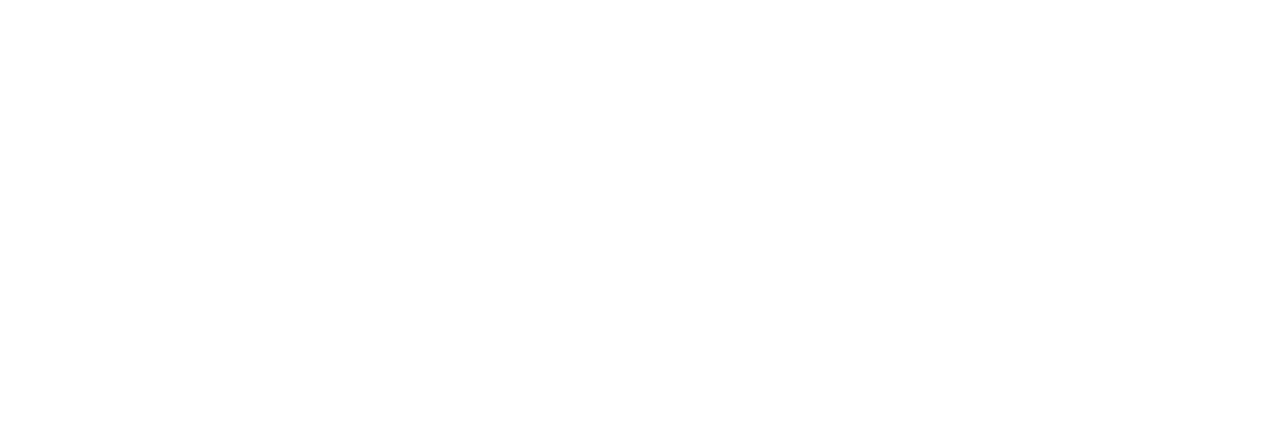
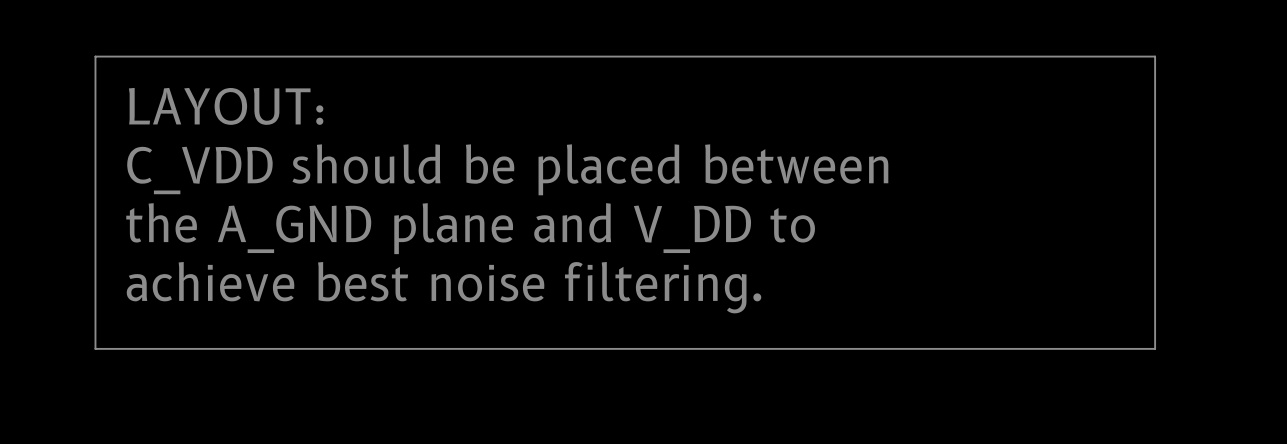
line: none -> (95, 56) (1155, 56) (1155, 348) (95, 348) (95, 56)
text: none -> LAYOUT: (226, 106)
text: none -> C_VDD should be placed between (507, 169)
text: none -> the A_GND plane and V_DD to (470, 228)
text: none -> achieve best noise filtering. (444, 287)

